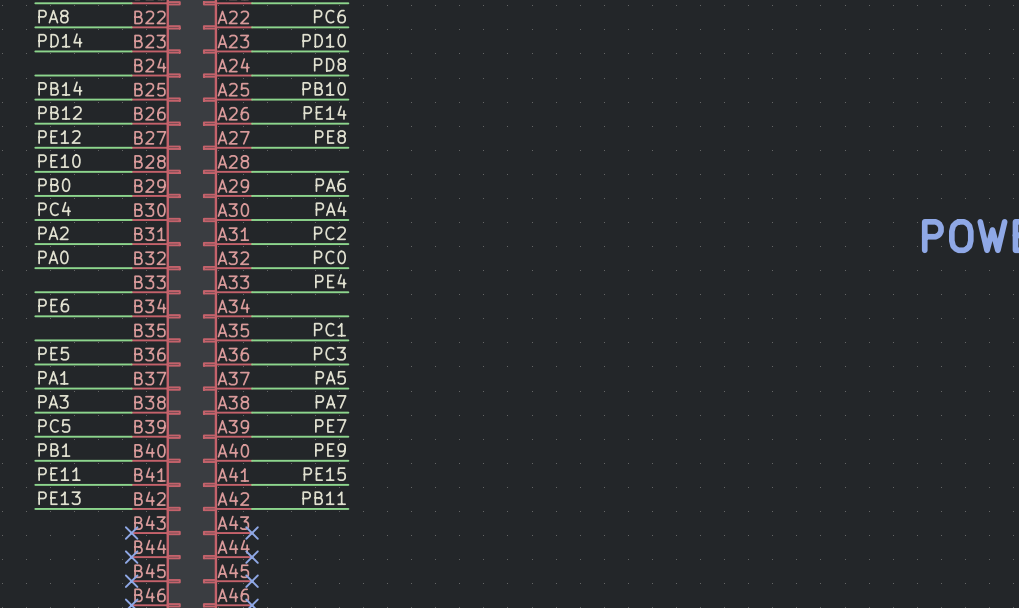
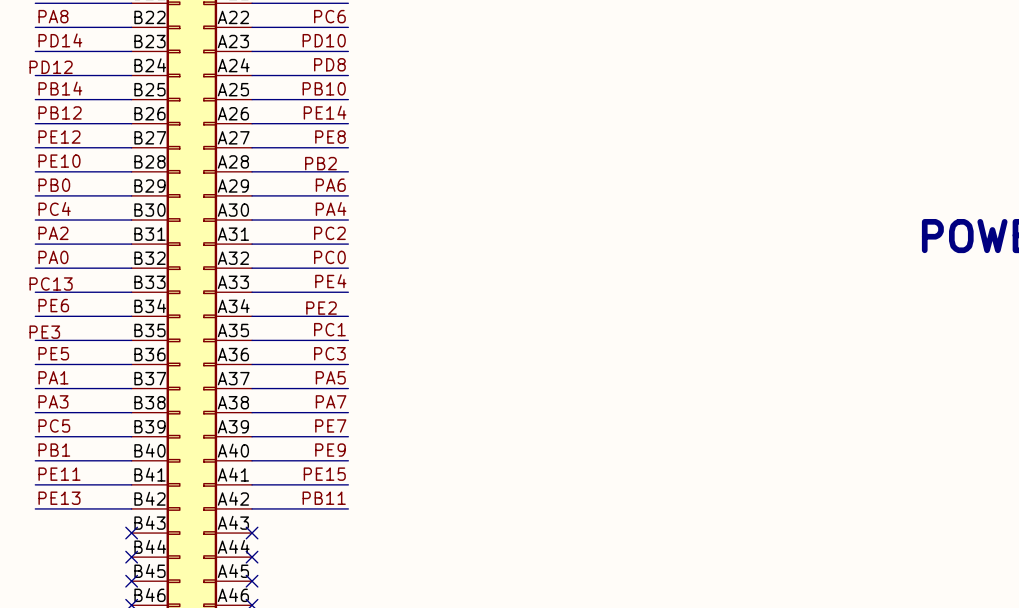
label: none -> PD12 (51, 67)
label: none -> PB2 (320, 163)
label: none -> PC13 (51, 283)
label: none -> PE2 (321, 308)
label: none -> PE3 (44, 332)

